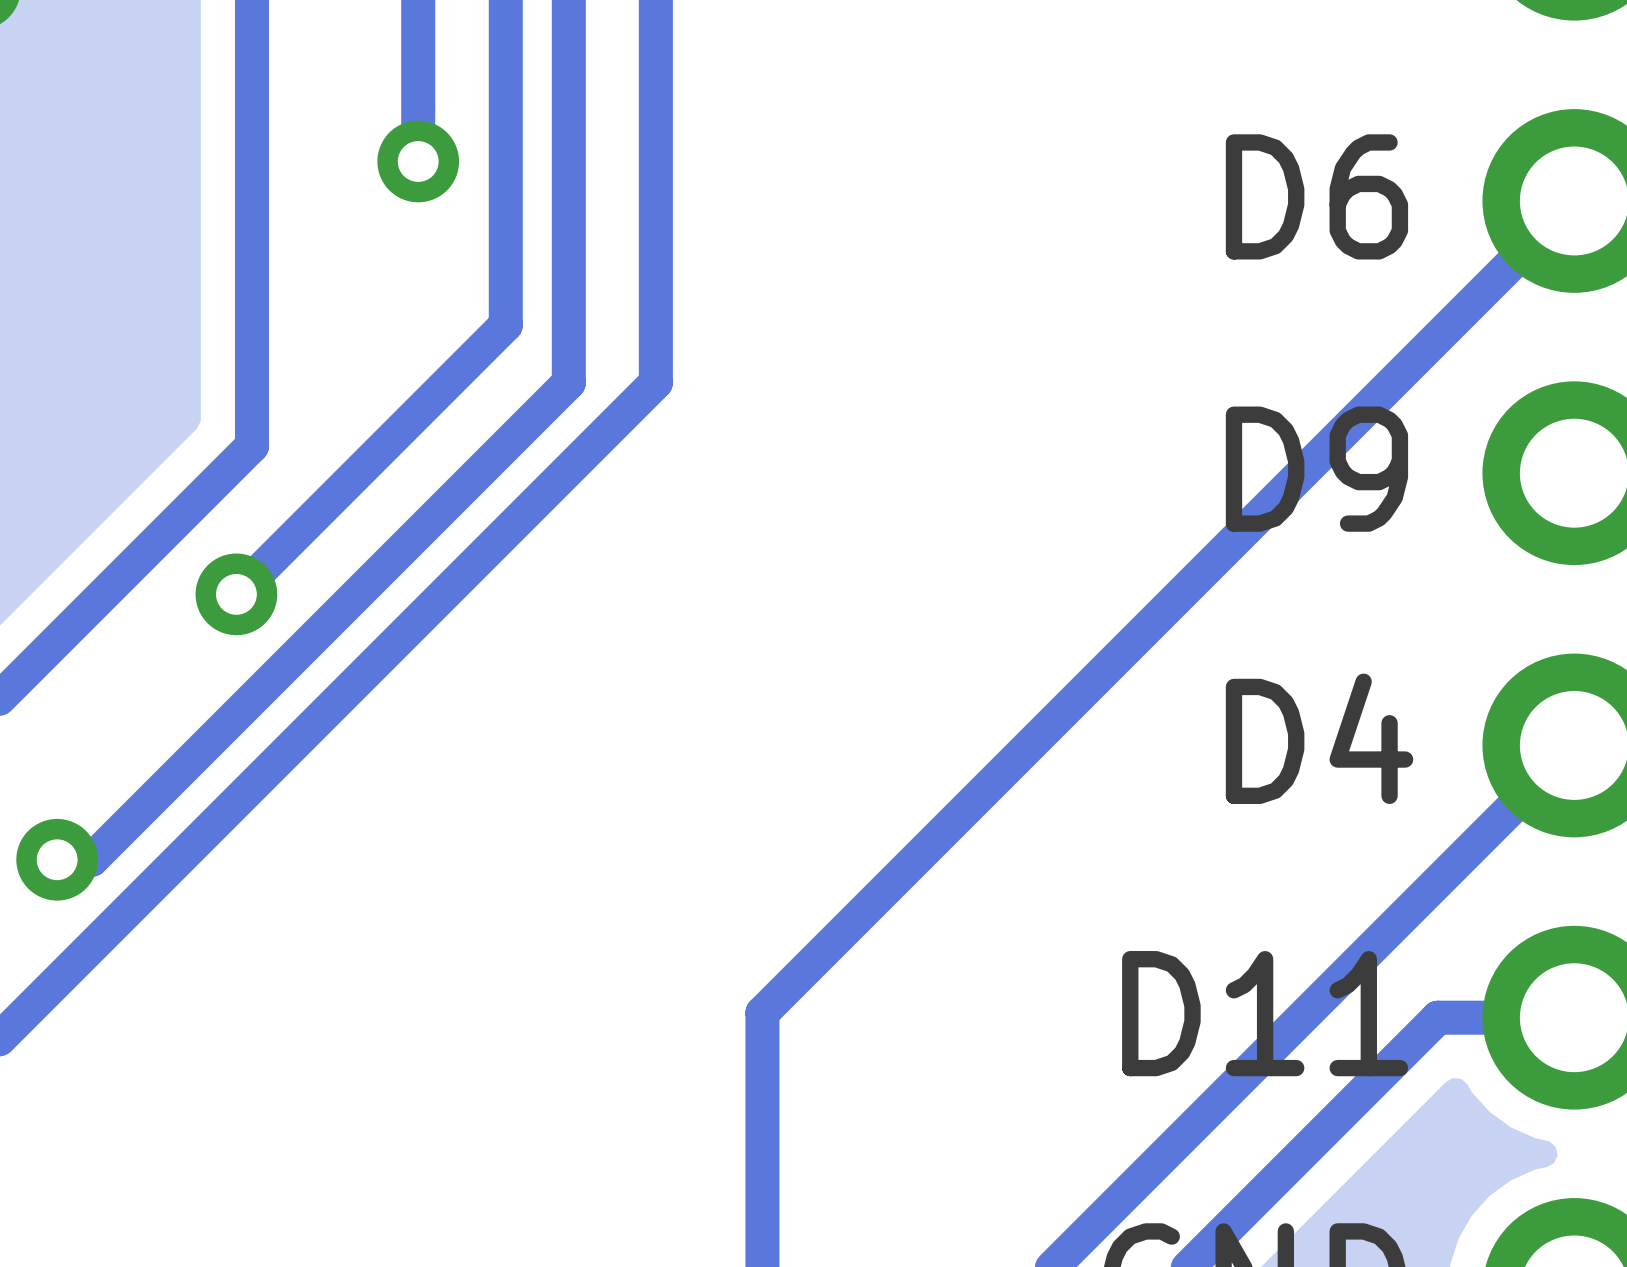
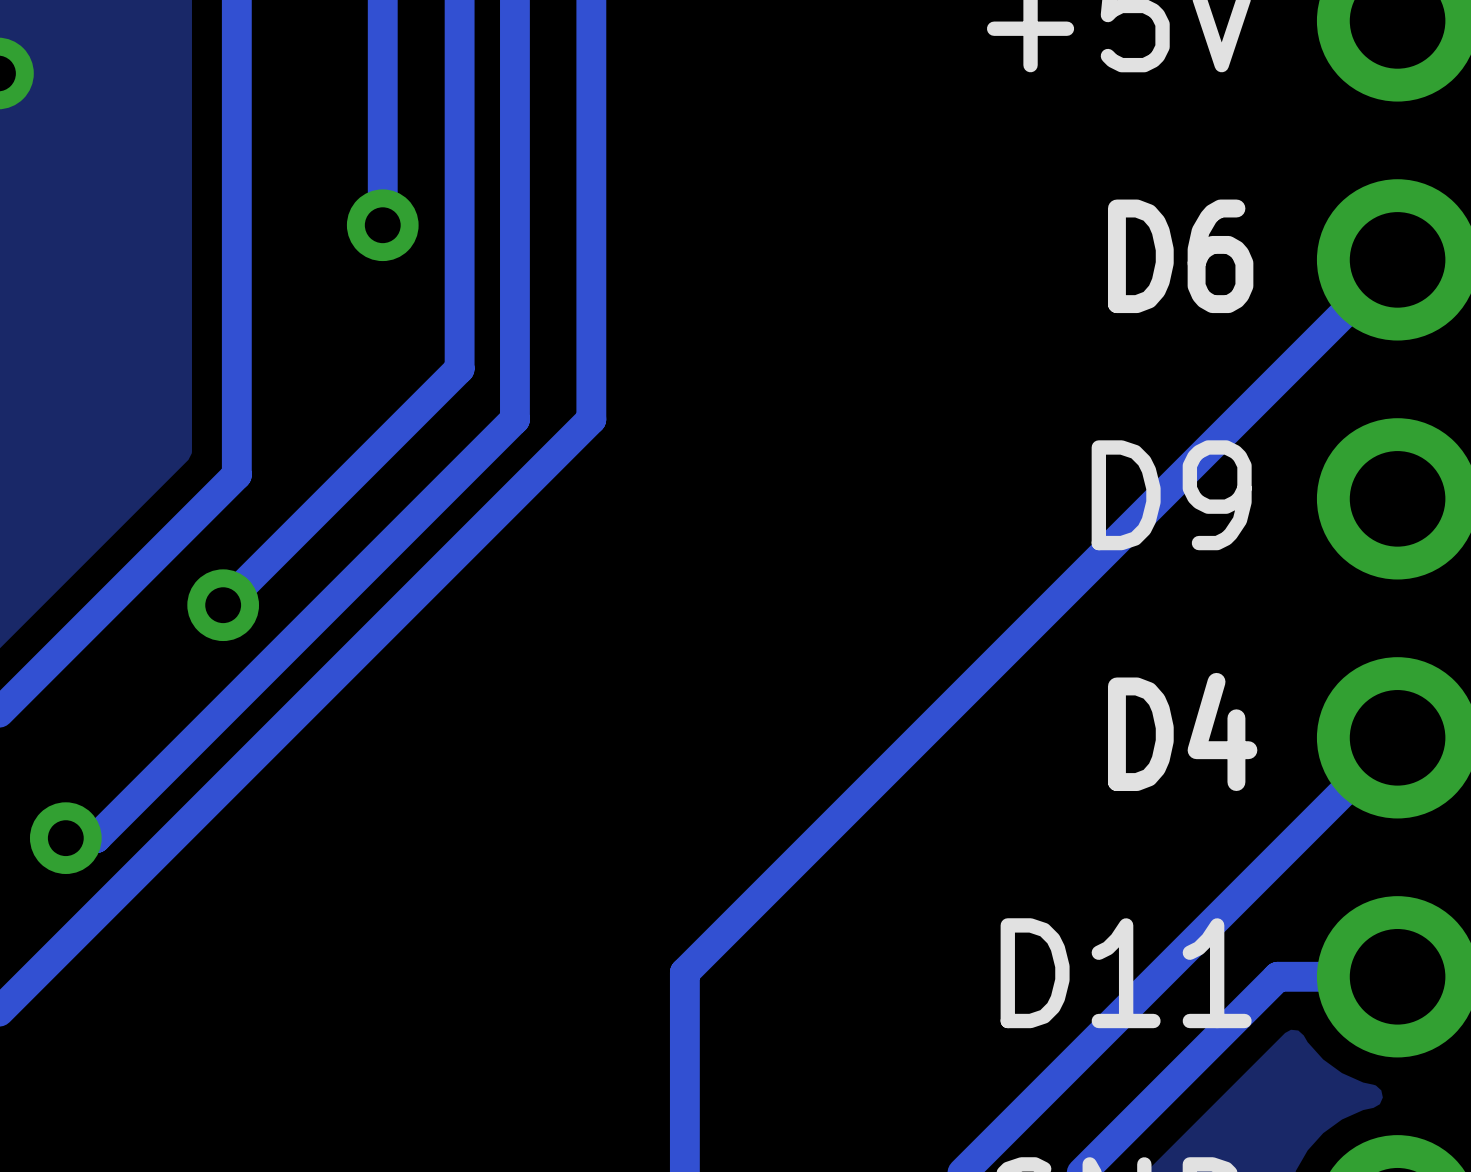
text position: D6 (1316, 196) -> D6 (1180, 256)
text position: D4 (1319, 738) -> D4 (1182, 731)

